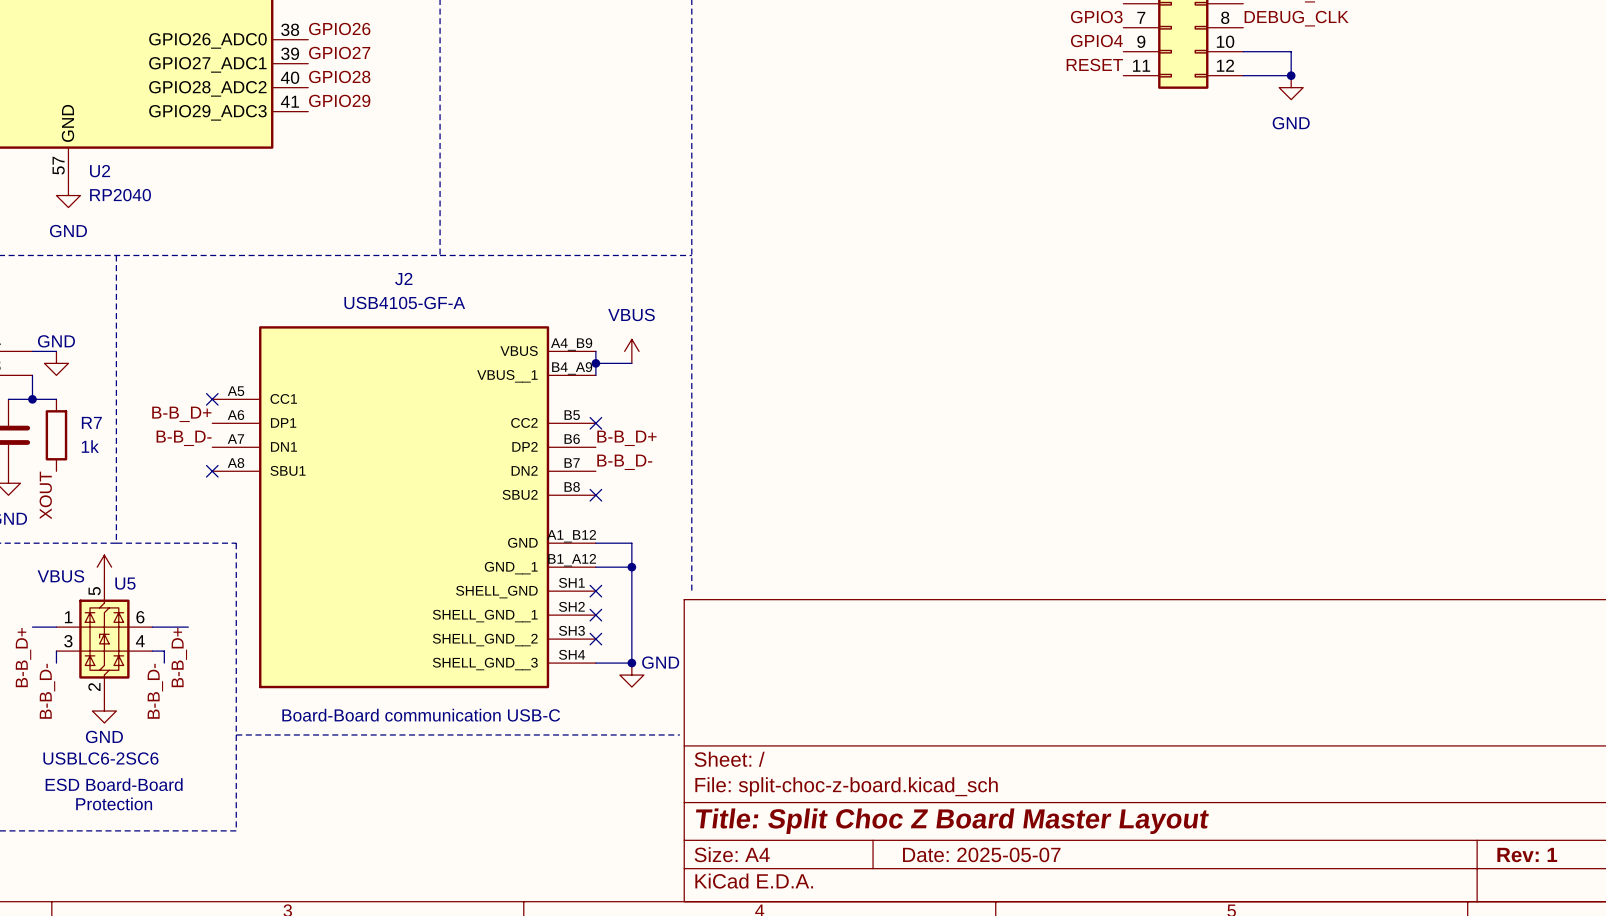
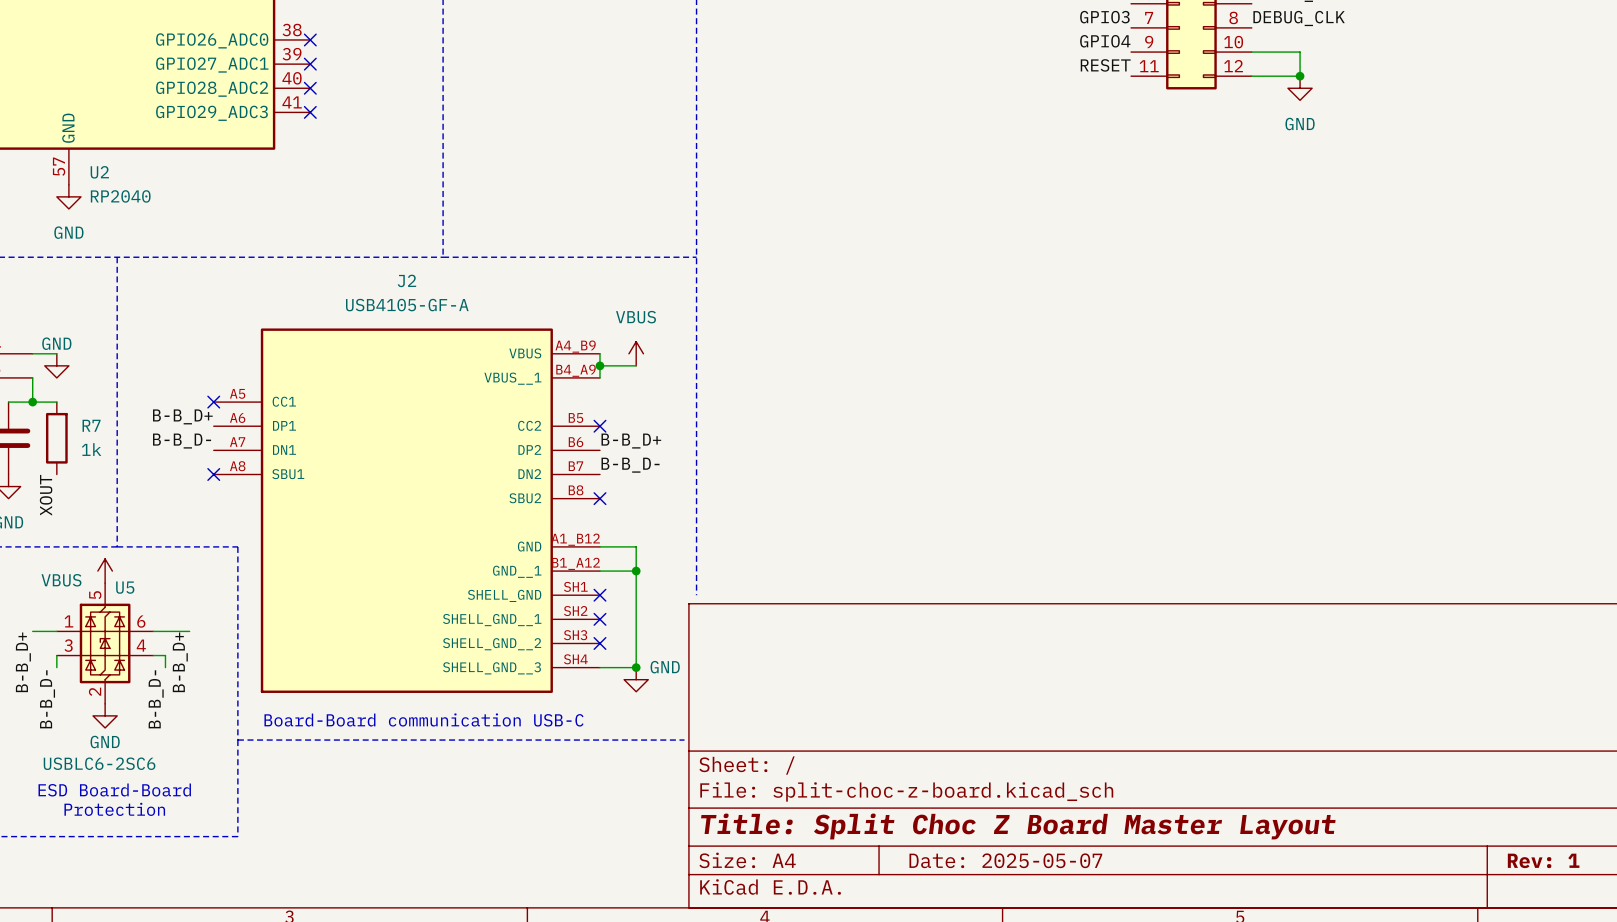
label: GPIO26 (339, 29) -> none
no-connect mark: none -> (310, 39)
label: GPIO27 (339, 52) -> none
no-connect mark: none -> (310, 64)
label: GPIO28 (339, 76) -> none
no-connect mark: none -> (310, 88)
label: GPIO29 (339, 100) -> none
no-connect mark: none -> (310, 112)

